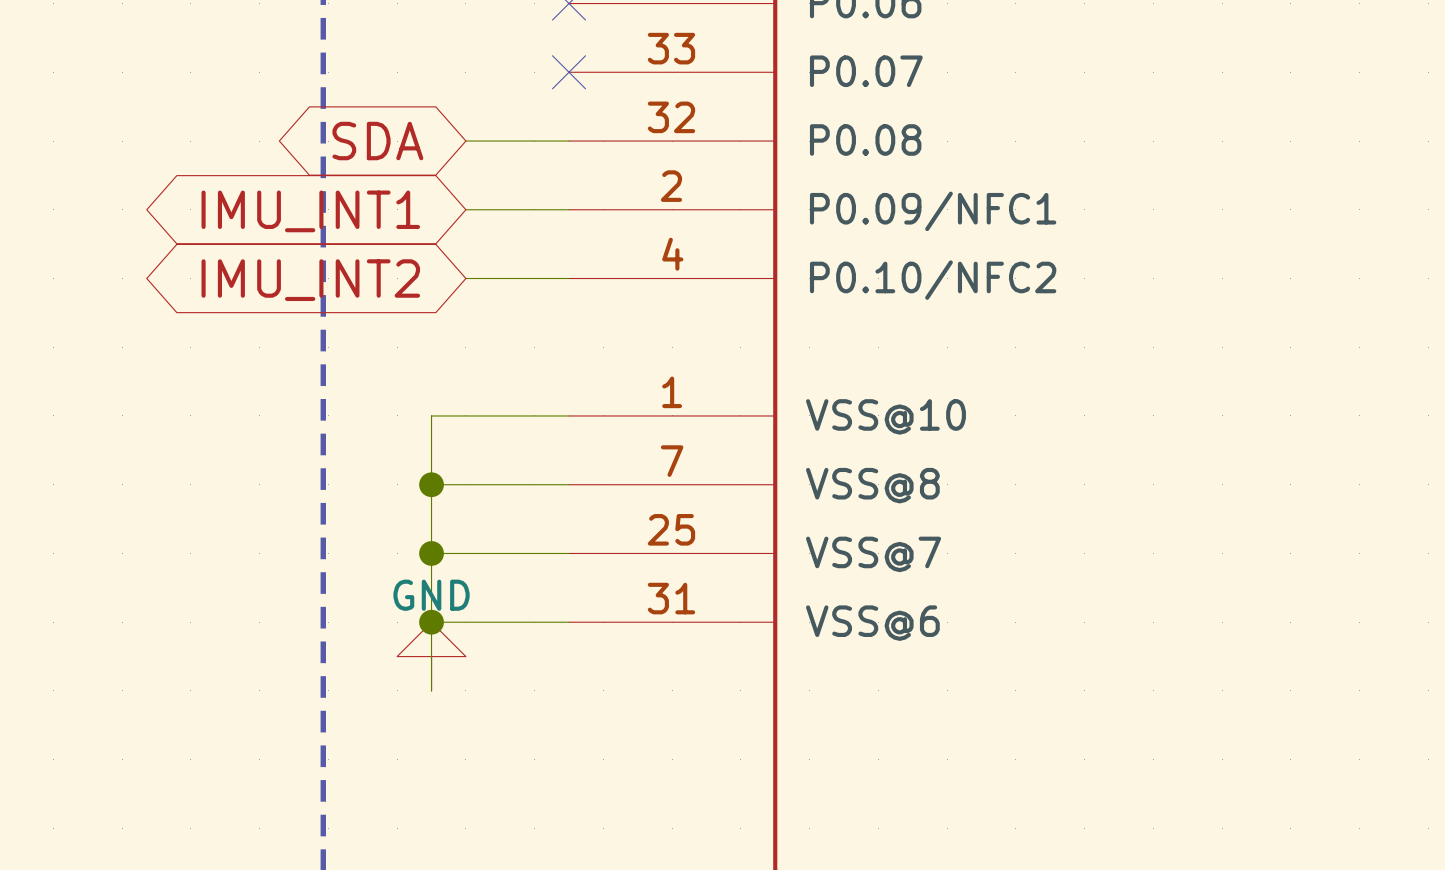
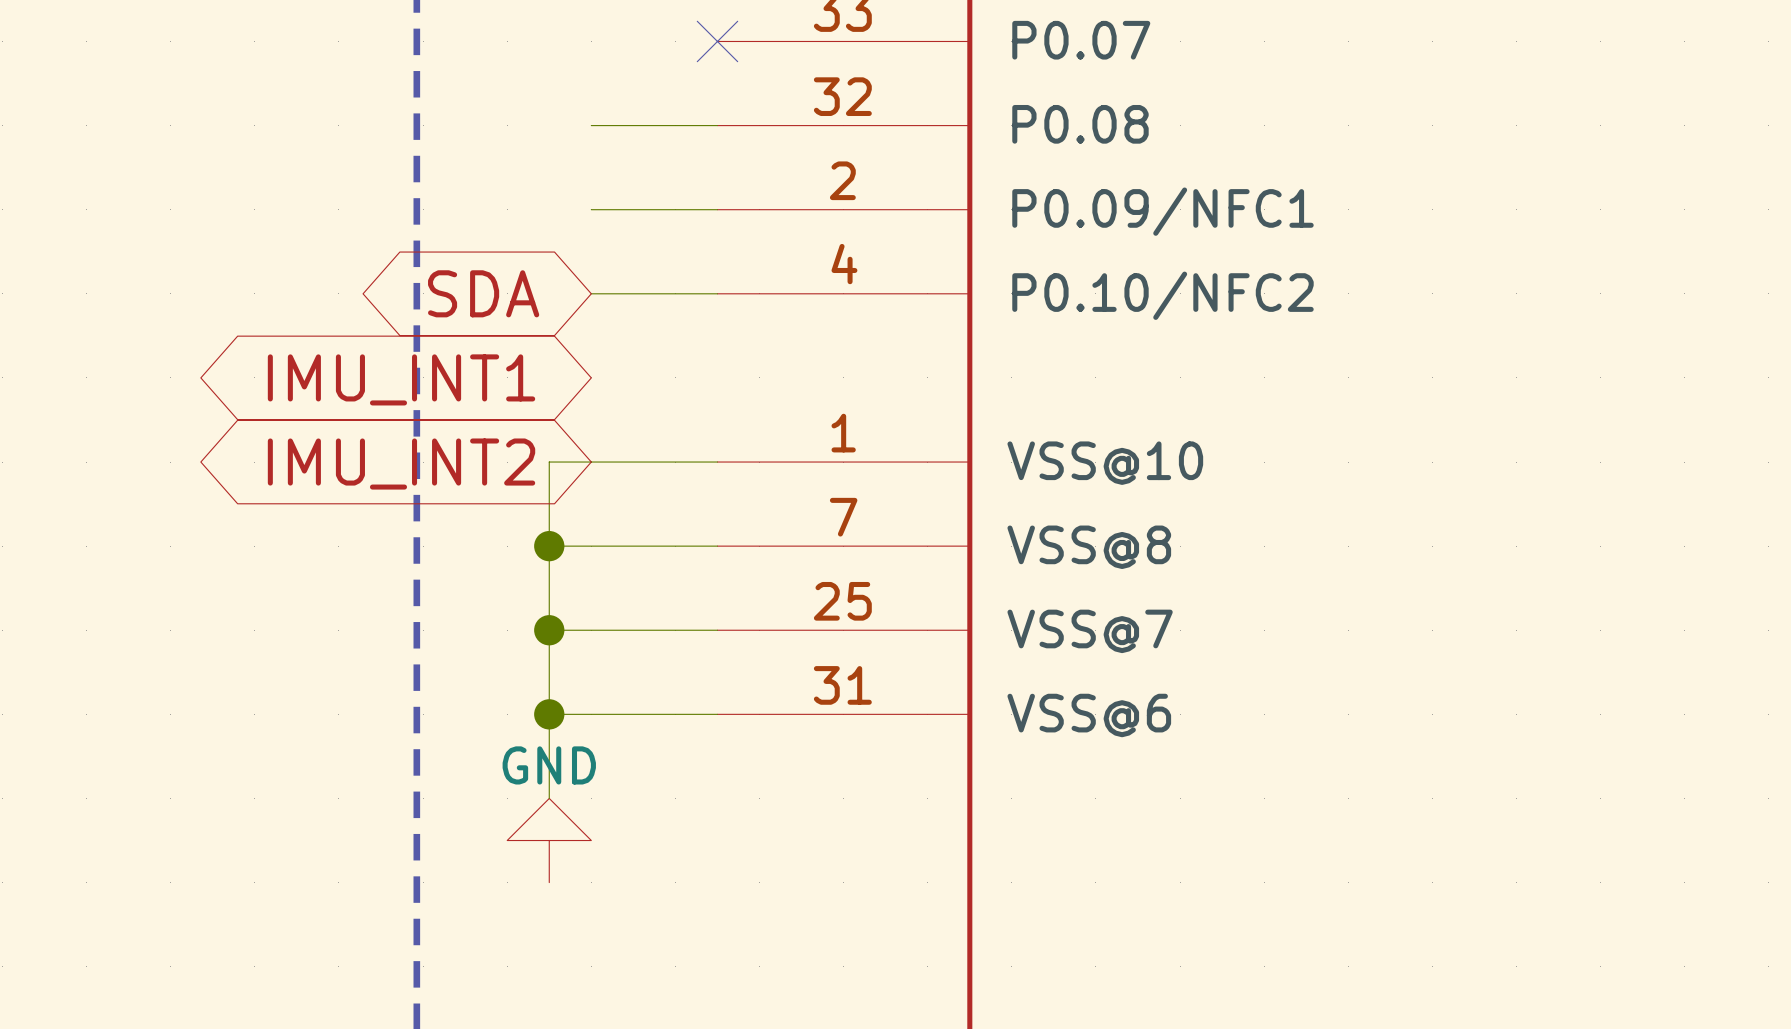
global label: SDA (377, 141) -> none
global label position: IMU_INT1 (310, 211) -> IMU_INT1 (401, 379)
global label: IMU_INT2 (310, 280) -> SDA (483, 293)
global label: none -> IMU_INT2 (401, 464)
power symbol position: GND (431, 656) -> GND (549, 840)

